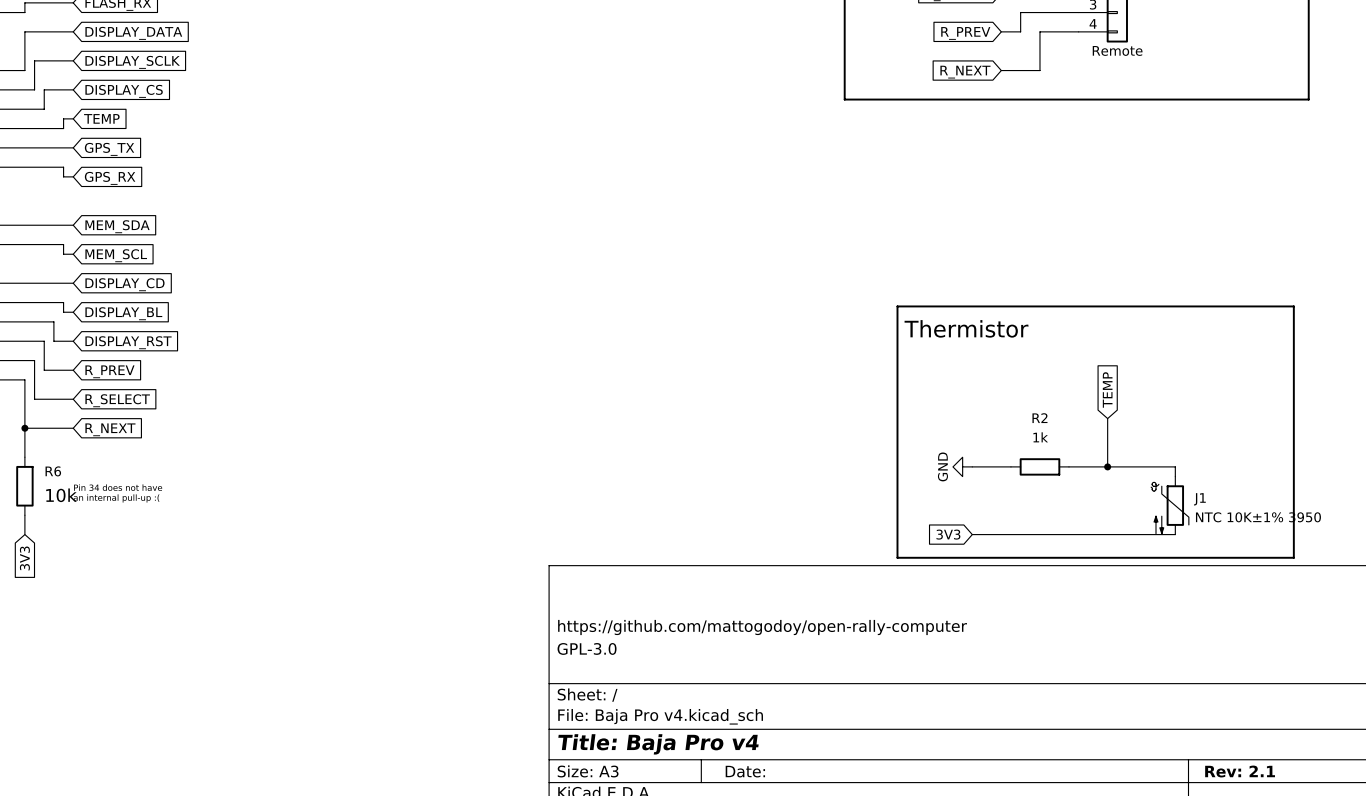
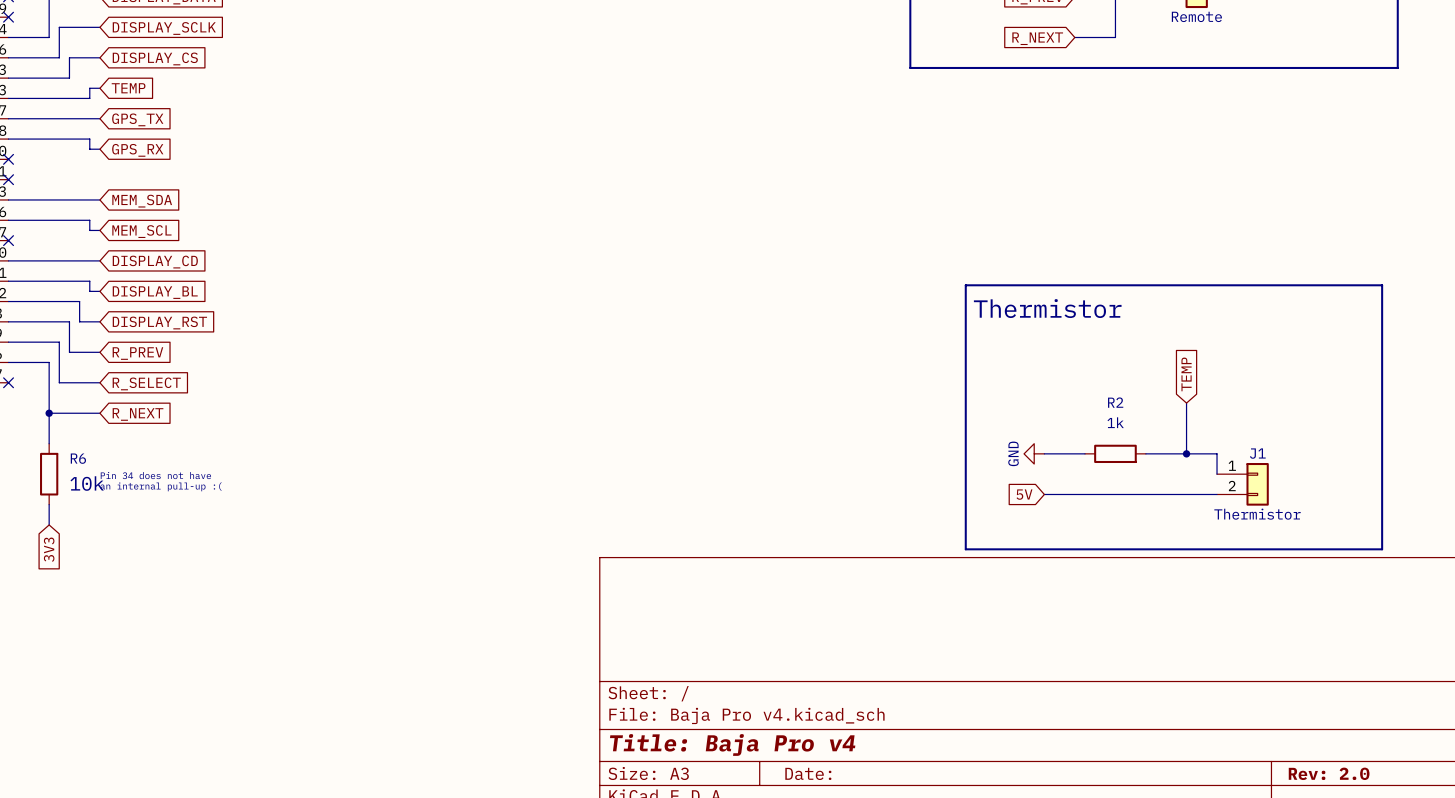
wire: (1136, 466) (1175, 466) (1175, 476) -> (1217, 453) (1217, 474)
J1 symbol: [1151, 476, 1189, 535] -> [1217, 463, 1269, 506]
J1 name position: J1 (1199, 499) -> J1 (1257, 453)
global label: none -> 5V (1024, 494)
wire: none -> (1044, 494) (1217, 494)
J1 value: NTC 10K±1% 3950 (1258, 517) -> Thermistor (1257, 514)
global label: 3V3 (948, 534) -> none
wire: (972, 534) (1175, 534) -> none
title block: https://github.com/mattogodoy/open-rally-computer (762, 627) -> none
title block: GPL-3.0 (587, 648) -> none
title block: Rev: 2.1 (1240, 771) -> Rev: 2.0 (1329, 773)

